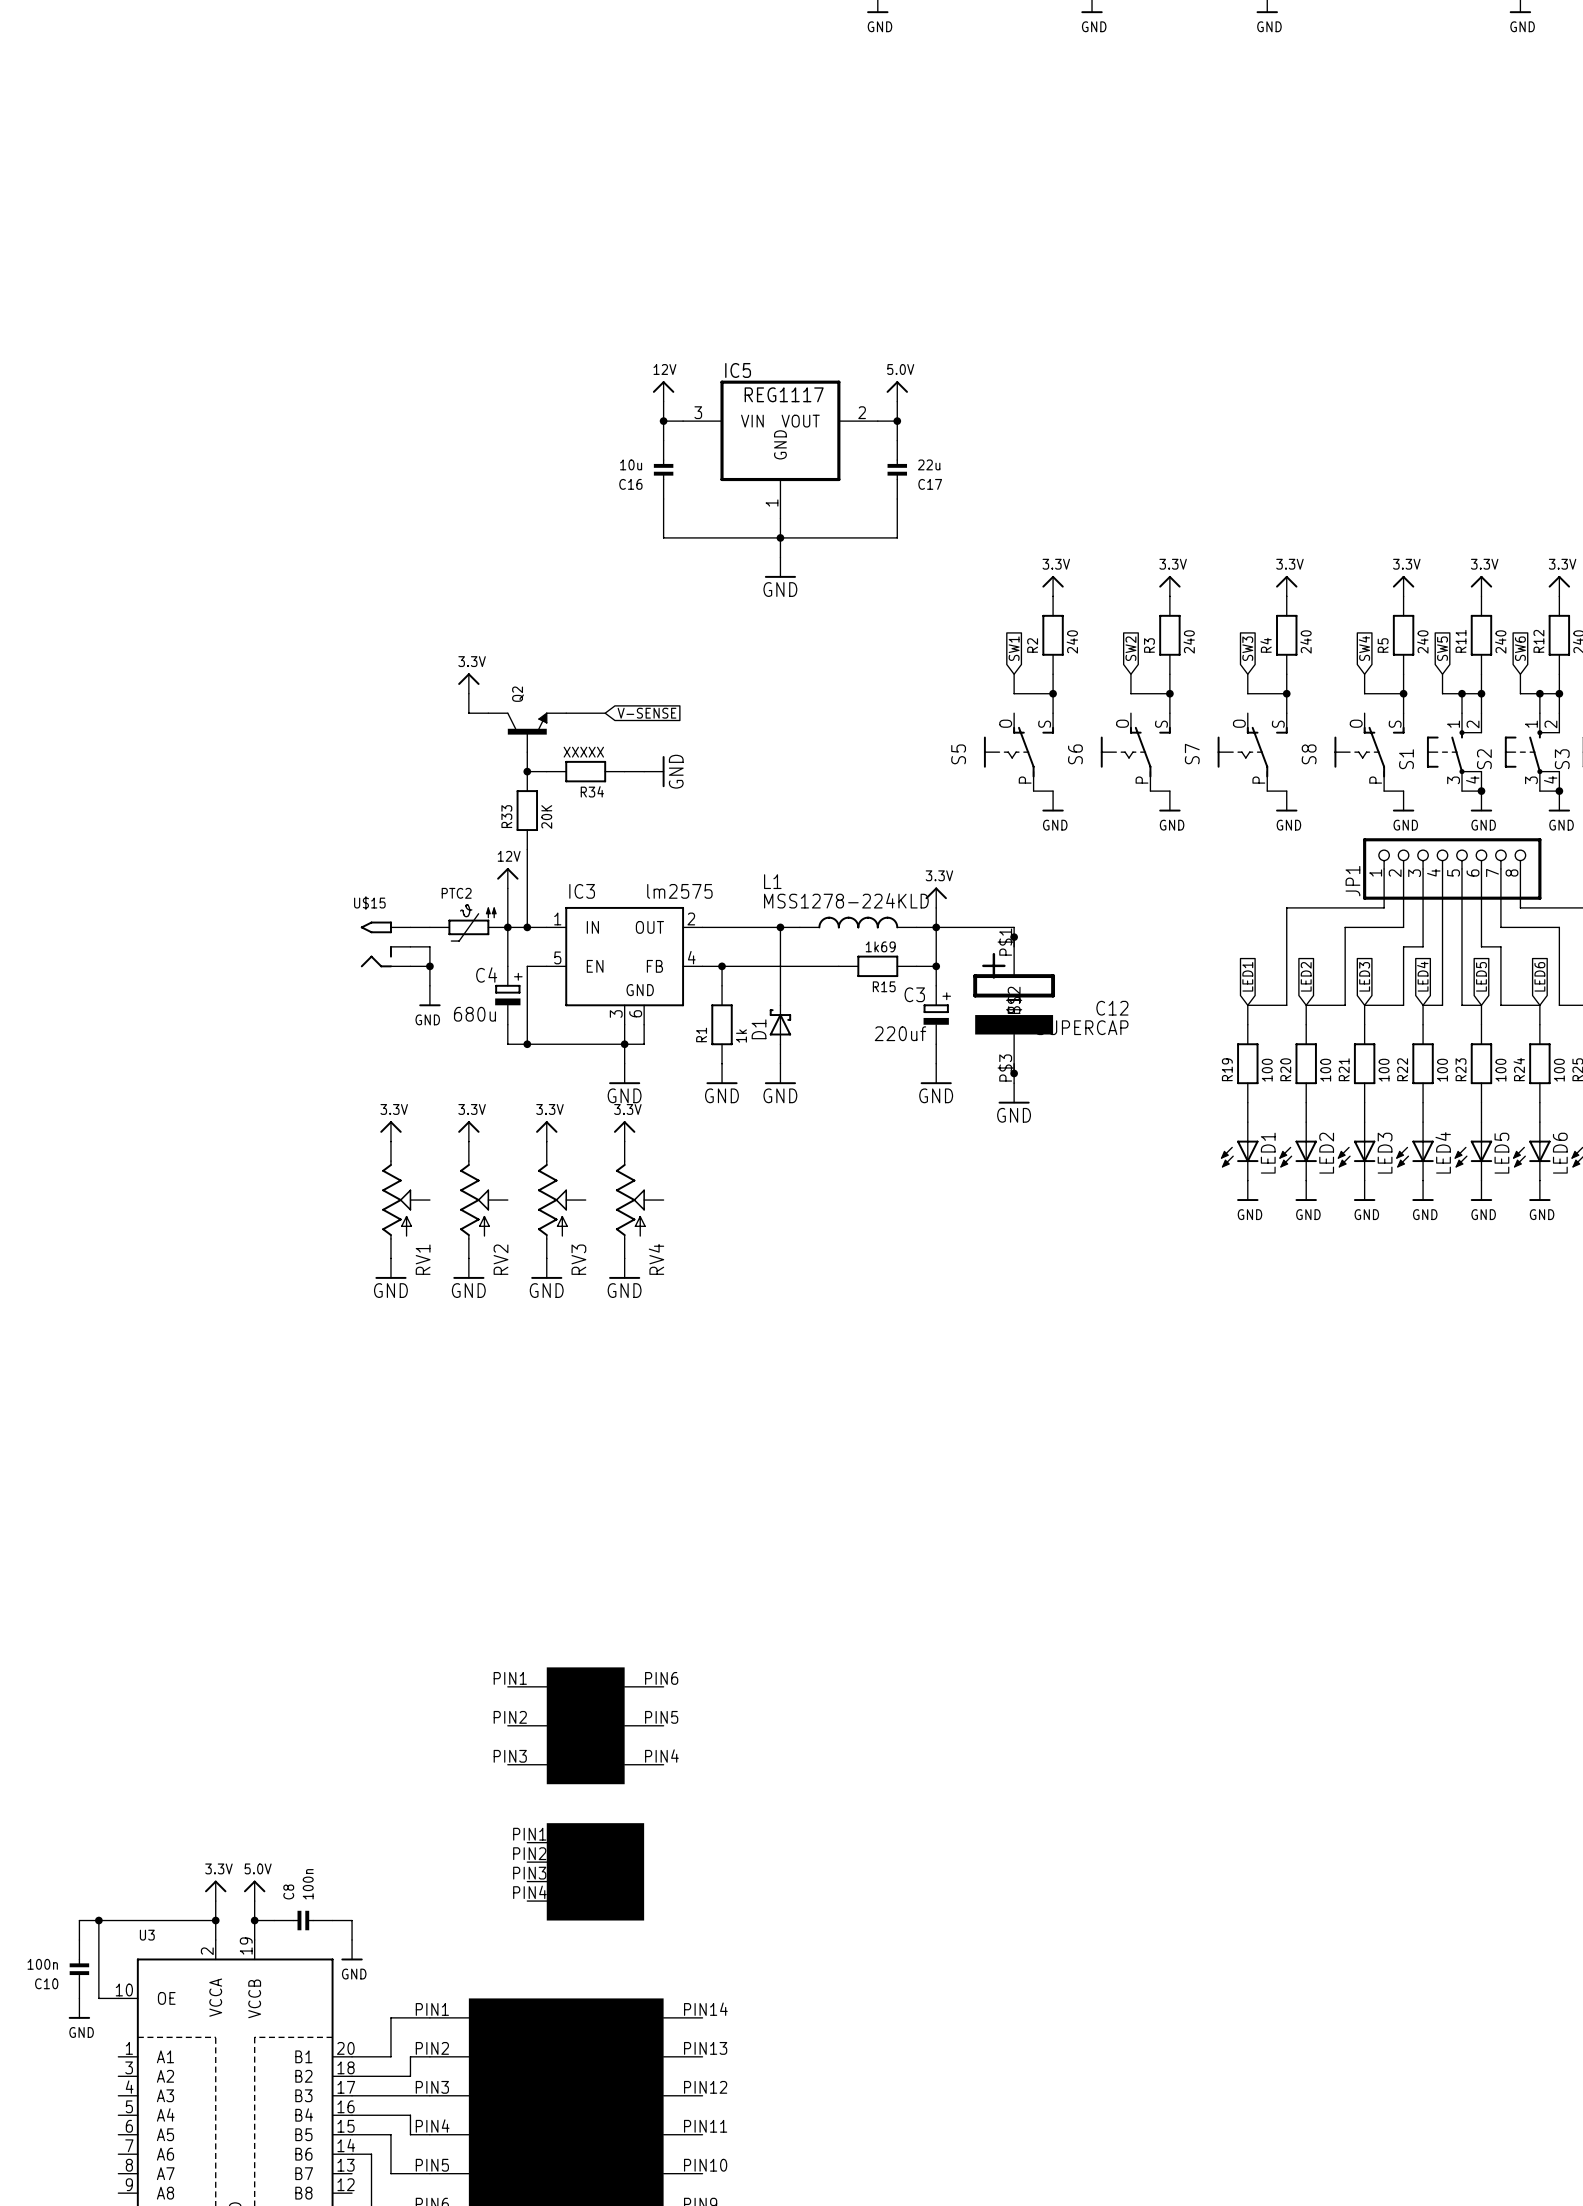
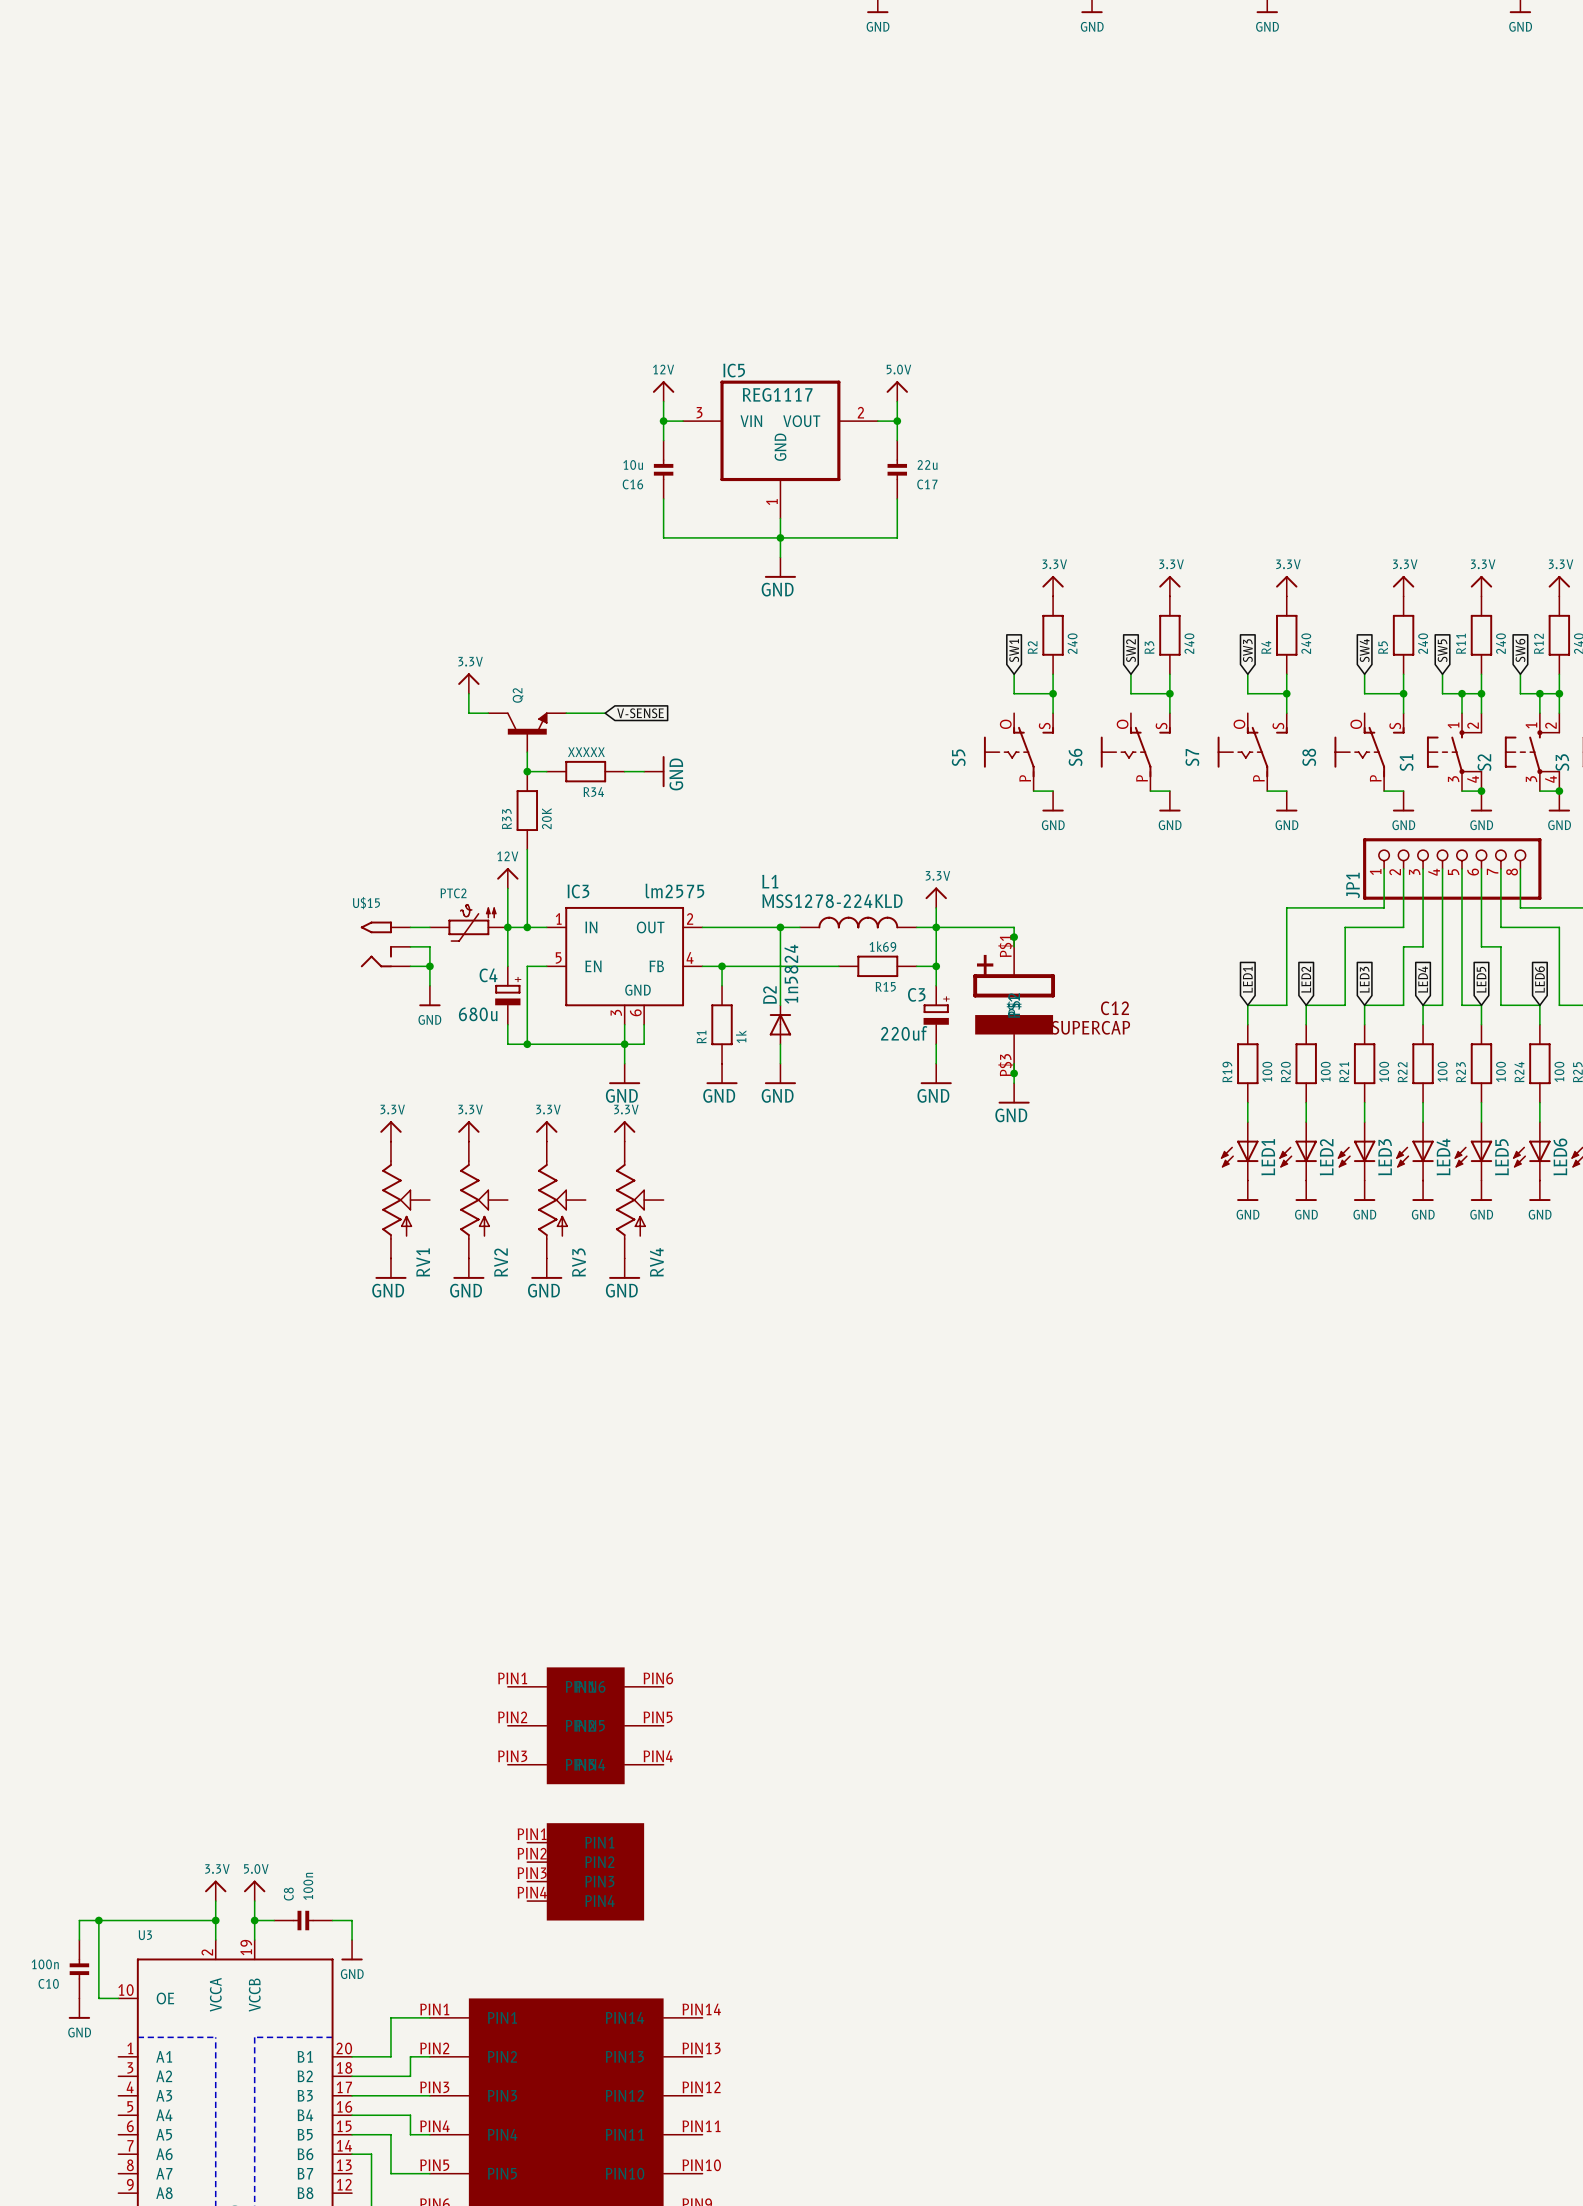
D1: (780, 1024) -> none
D2: none -> 1n5824 (780, 1024)

